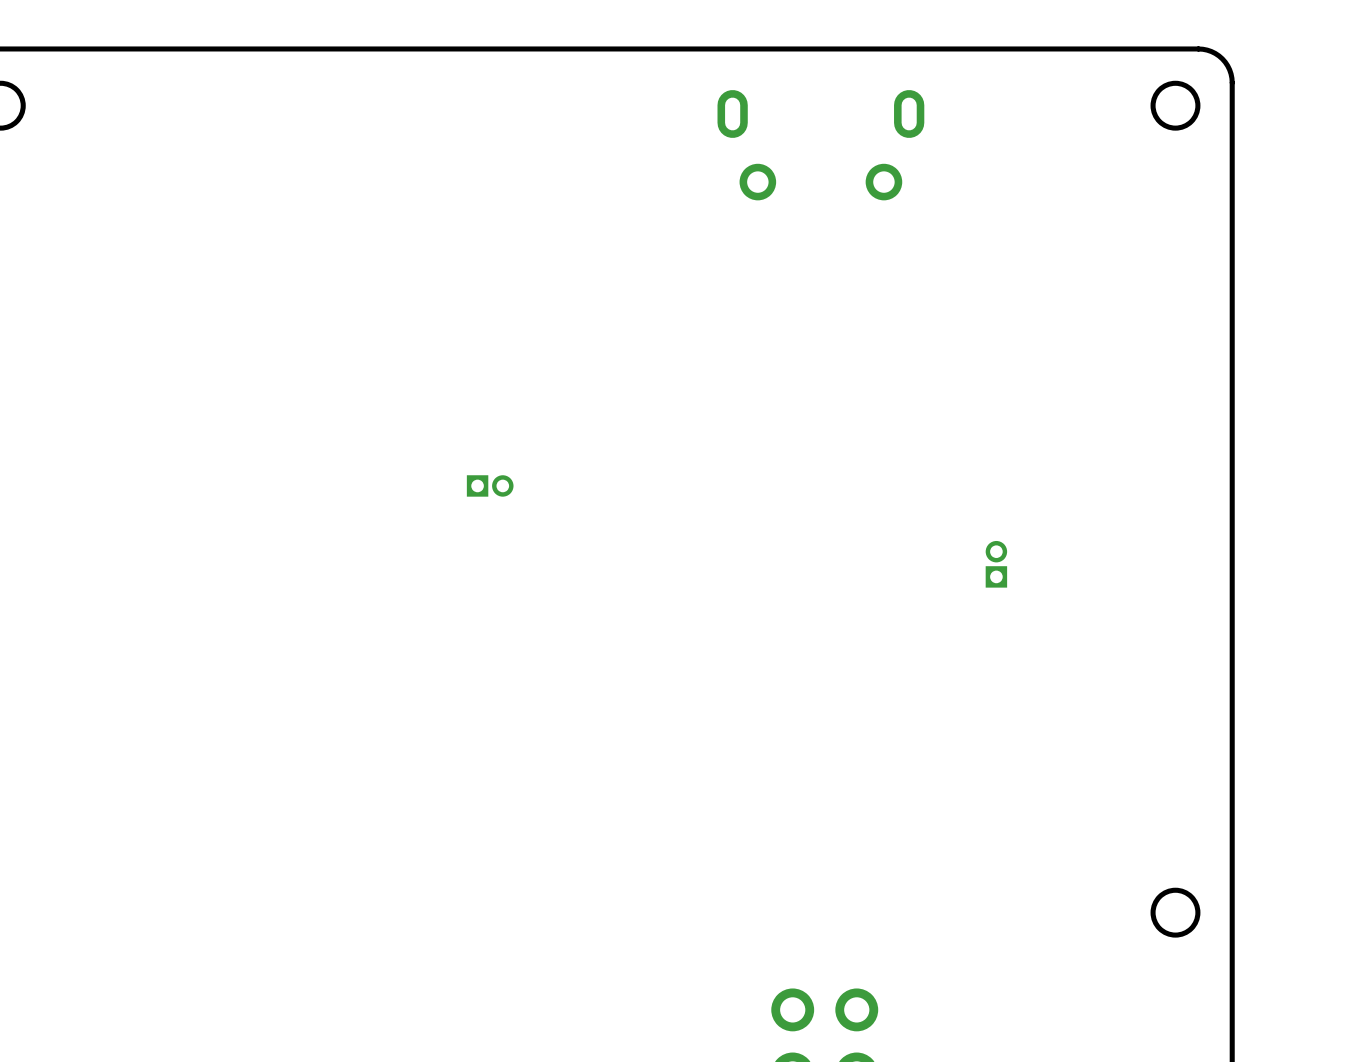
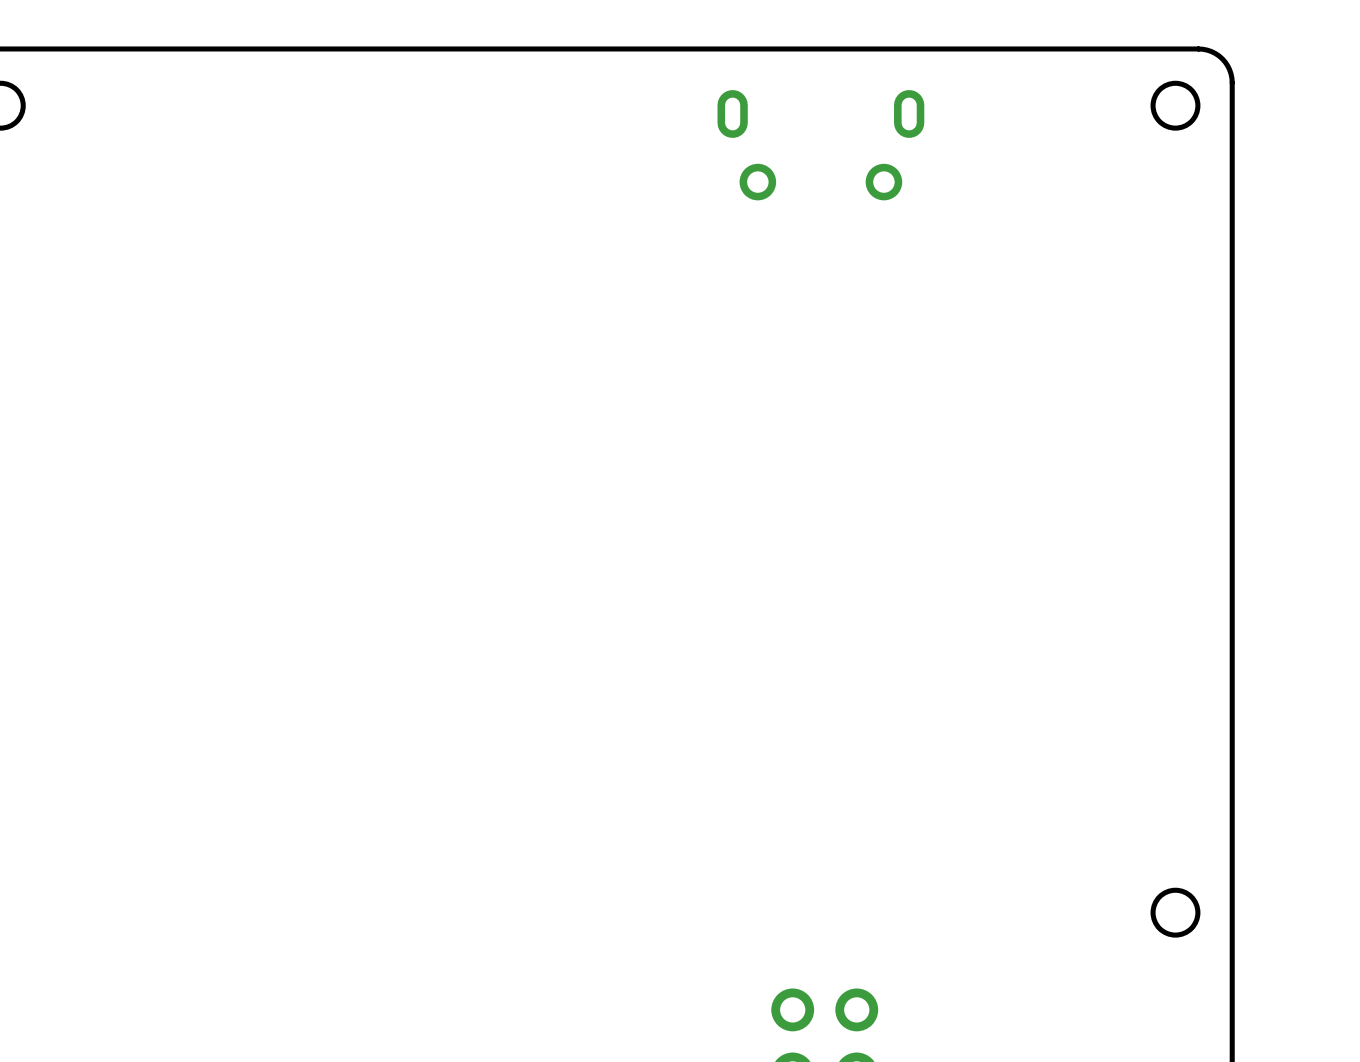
part: (490, 485) -> none
part: (996, 564) -> none

